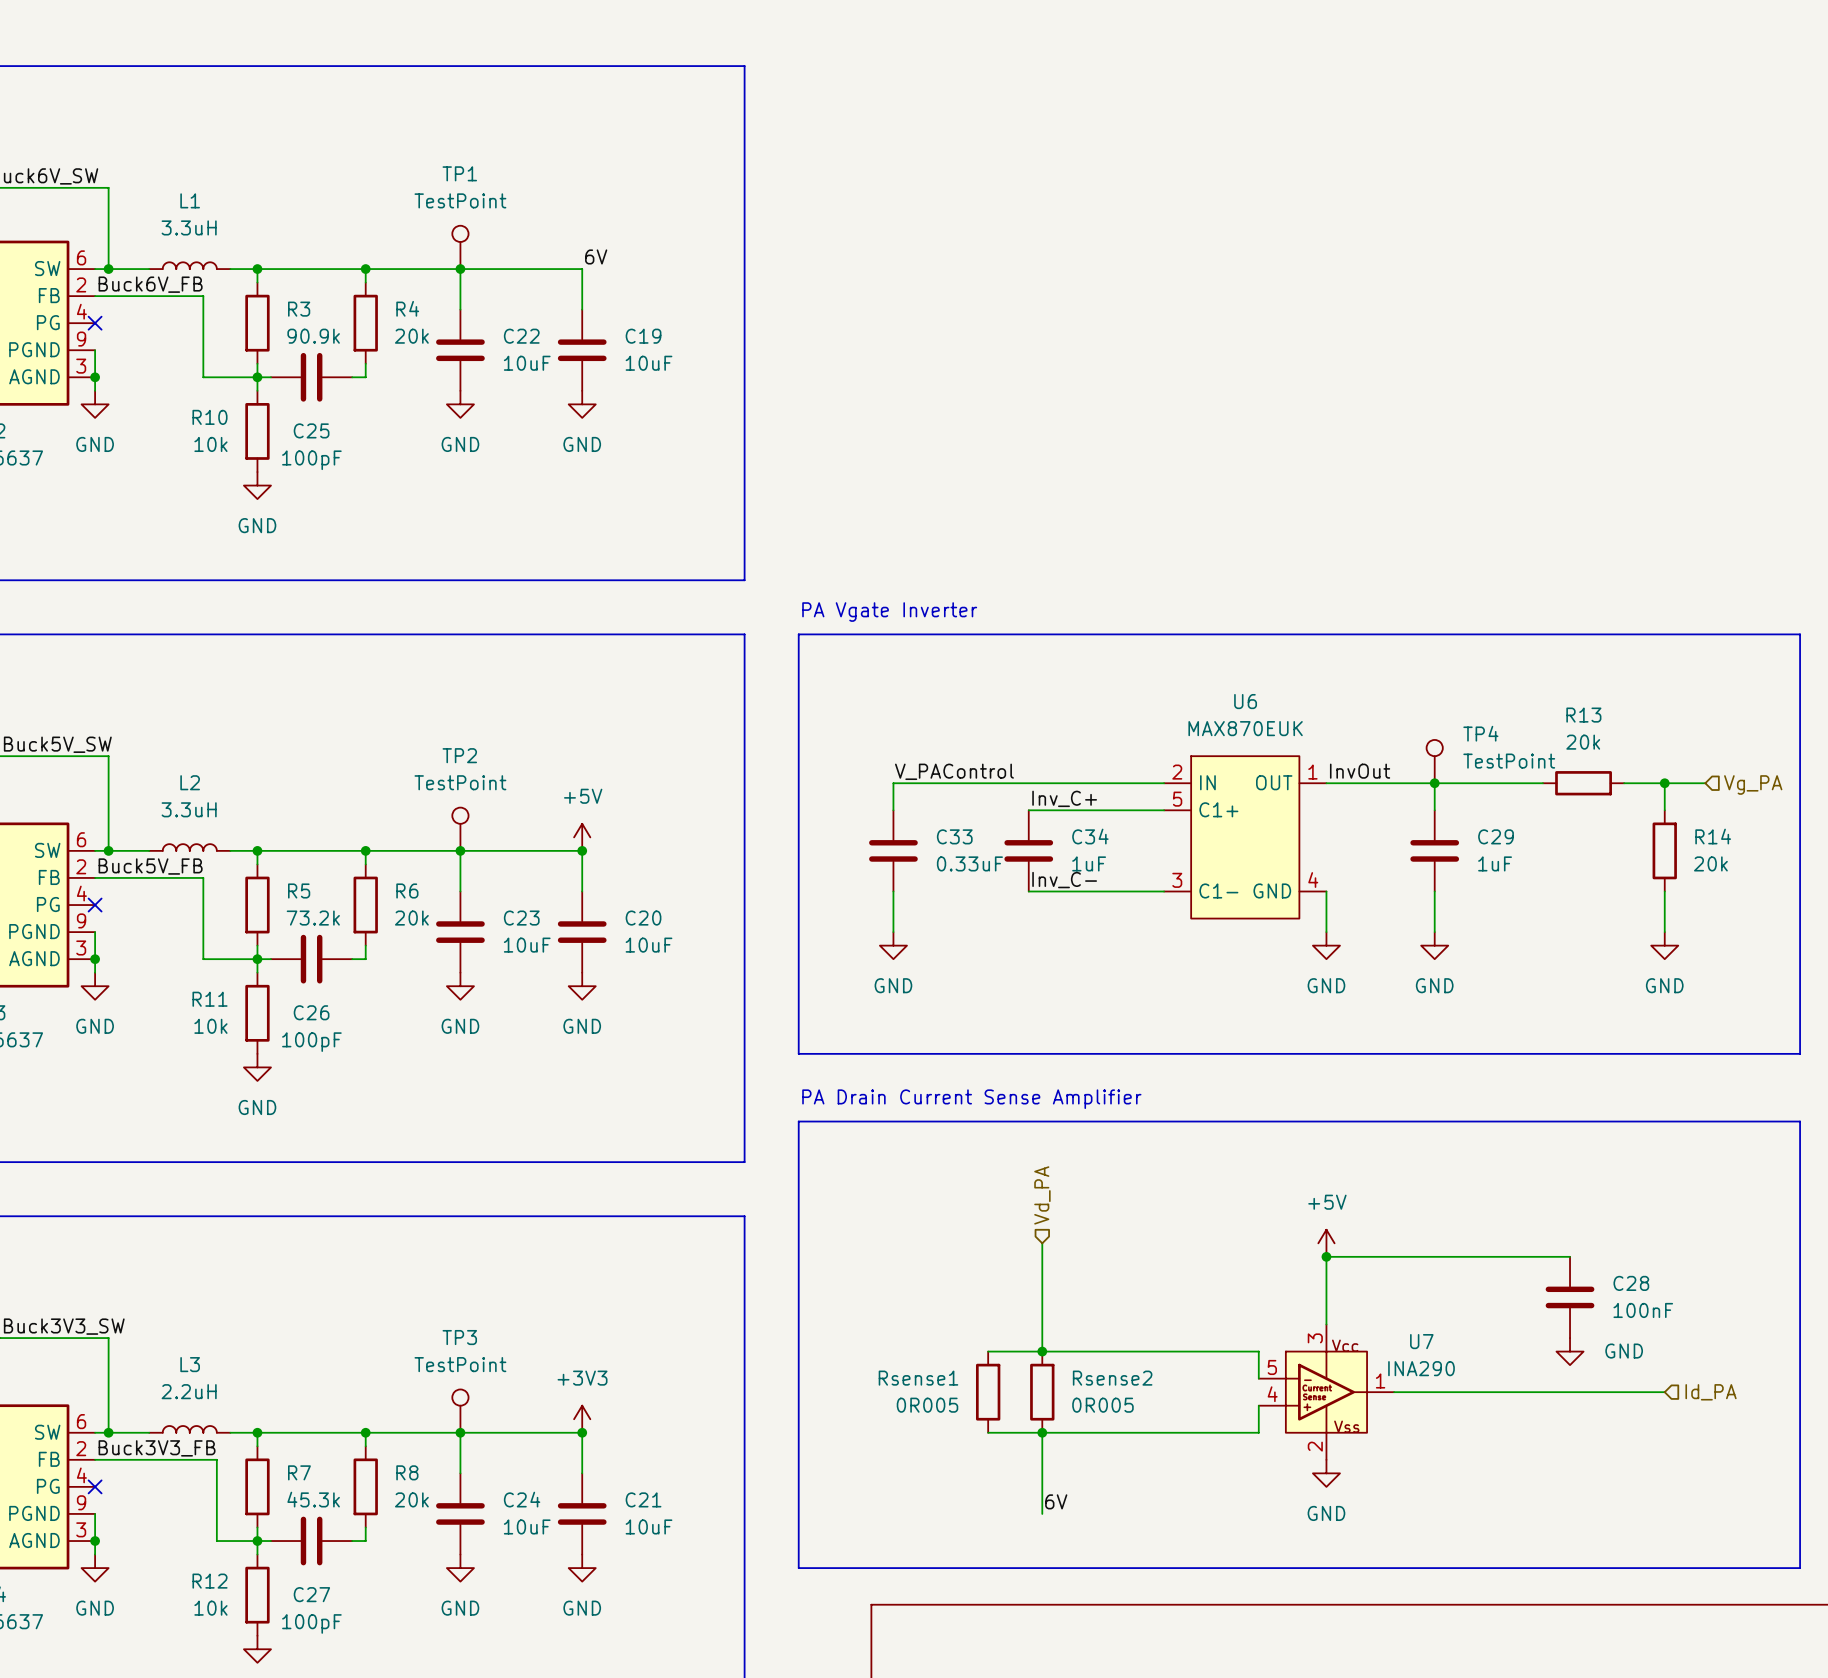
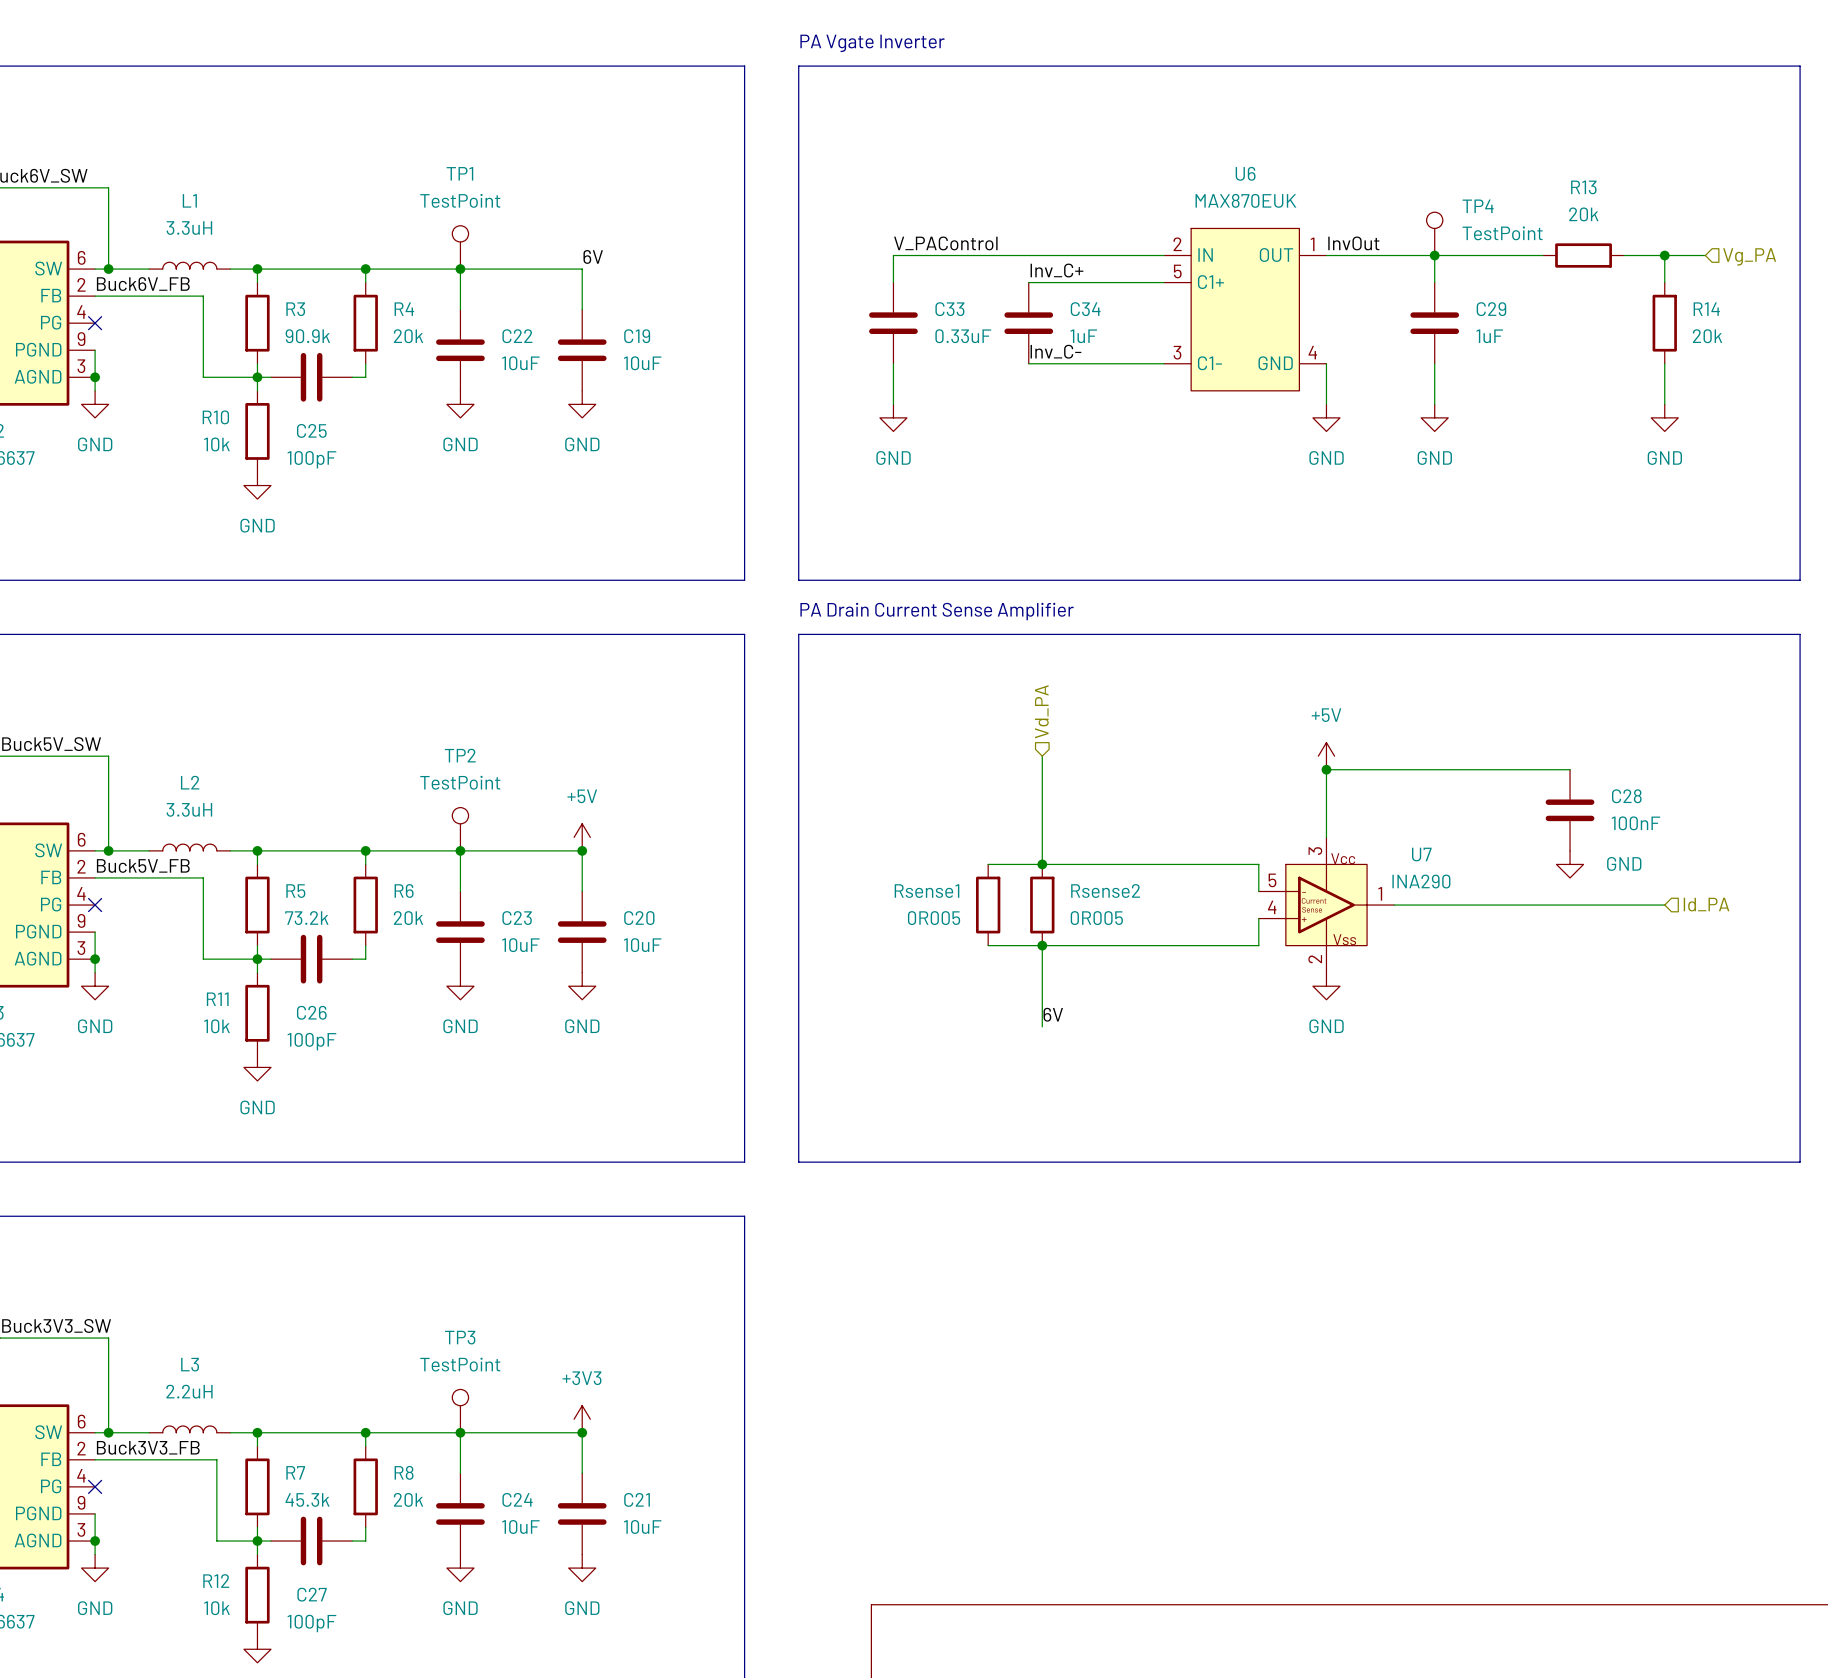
text: none -> PA Vgate Inverter (872, 43)
line: none -> (798, 66) (1800, 66) (1800, 580) (798, 580) (798, 66)
label: none -> InvOut (1353, 243)
label: none -> V_PAControl (945, 243)
wire: none -> (1164, 255) (893, 255) (893, 282)
wire: none -> (1326, 255) (1542, 255)
wire: none -> (1434, 255) (1434, 282)
junction: none -> (1434, 255)
wire: none -> (1624, 255) (1705, 255)
wire: none -> (1664, 255) (1664, 282)
junction: none -> (1664, 255)
hierarchical label: none -> Vg_PA (1749, 256)
label: none -> Inv_C+ (1056, 270)
wire: none -> (1028, 282) (1164, 282)
label: none -> Inv_C- (1055, 351)
wire: none -> (893, 363) (893, 404)
wire: none -> (1028, 363) (1164, 363)
wire: none -> (1326, 363) (1326, 404)
wire: none -> (1434, 363) (1434, 404)
wire: none -> (1664, 363) (1664, 404)
power symbol: none -> GND (893, 417)
power symbol: none -> GND (1326, 417)
power symbol: none -> GND (1434, 417)
power symbol: none -> GND (1664, 417)
text: PA Vgate Inverter (889, 612) -> PA Drain Current Sense Amplifier (937, 611)
hierarchical label: none -> Vd_PA (1041, 711)
wire: none -> (1042, 756) (1042, 864)
power symbol: none -> +5V (1326, 756)
TP4 position: (1434, 761) -> (1434, 233)
junction: none -> (1326, 769)
wire: none -> (1570, 769) (1326, 769) (1326, 837)
label: V_PAControl (954, 771) -> none
label: InvOut (1360, 771) -> none
wire: (1164, 783) (893, 783) (893, 810) -> none
wire: (1326, 783) (1542, 783) -> none
wire: (1434, 783) (1434, 810) -> none
junction: (1434, 783) -> none
R13 position: (1583, 783) -> (1583, 255)
wire: (1624, 783) (1705, 783) -> none
wire: (1664, 783) (1664, 810) -> none
junction: (1664, 783) -> none
hierarchical label: Vg_PA (1753, 784) -> none
label: Inv_C+ (1064, 798) -> none
wire: (1028, 810) (1164, 810) -> none
U6 position: (1245, 837) -> (1245, 309)
C33 position: (893, 850) -> (893, 323)
C34 position: (1028, 850) -> (1028, 323)
C29 position: (1434, 850) -> (1434, 323)
R14 position: (1664, 850) -> (1664, 323)
wire: none -> (988, 864) (1258, 864) (1258, 891)
junction: none -> (1042, 864)
power symbol: none -> GND (1570, 864)
label: Inv_C- (1064, 880) -> none
wire: (893, 891) (893, 932) -> none
wire: (1028, 891) (1164, 891) -> none
wire: (1434, 891) (1434, 932) -> none
wire: (1664, 891) (1664, 932) -> none
wire: none -> (1394, 905) (1664, 905)
hierarchical label: none -> Id_PA (1706, 904)
wire: none -> (1258, 918) (1258, 945) (988, 945)
power symbol: GND (893, 945) -> none
wire: none -> (1042, 945) (1042, 1026)
junction: none -> (1042, 945)
power symbol position: GND (1326, 945) -> GND (1326, 986)
power symbol: GND (1434, 945) -> none
power symbol: GND (1664, 945) -> none
label: none -> 6V (1053, 1014)
line: (798, 1053) (1800, 1053) -> (798, 1053) (798, 1121)
text: PA Drain Current Sense Amplifier (971, 1099) -> none
line: (798, 1121) (1800, 1121) -> (1800, 1053) (1800, 1121)
line: (798, 1162) (798, 1568) (1800, 1568) (1800, 1162) -> (798, 1162) (1800, 1162)
hierarchical label: Vd_PA (1042, 1195) -> none
wire: (1042, 1243) (1042, 1351) -> none
power symbol: +5V (1326, 1243) -> none
junction: (1326, 1256) -> none
wire: (1570, 1256) (1326, 1256) (1326, 1324) -> none
C28 position: (1570, 1297) -> (1570, 810)
wire: (988, 1351) (1258, 1351) (1258, 1378) -> none
junction: (1042, 1351) -> none
power symbol: GND (1570, 1351) -> none
Rsense1 position: (988, 1392) -> (988, 905)
Rsense2 position: (1042, 1392) -> (1042, 905)
U7 position: (1326, 1392) -> (1326, 905)
wire: (1394, 1392) (1664, 1392) -> none
hierarchical label: Id_PA (1711, 1392) -> none
wire: (1258, 1405) (1258, 1432) (988, 1432) -> none
wire: (1042, 1432) (1042, 1513) -> none
junction: (1042, 1432) -> none
power symbol: GND (1326, 1473) -> none
label: 6V (1056, 1501) -> none

